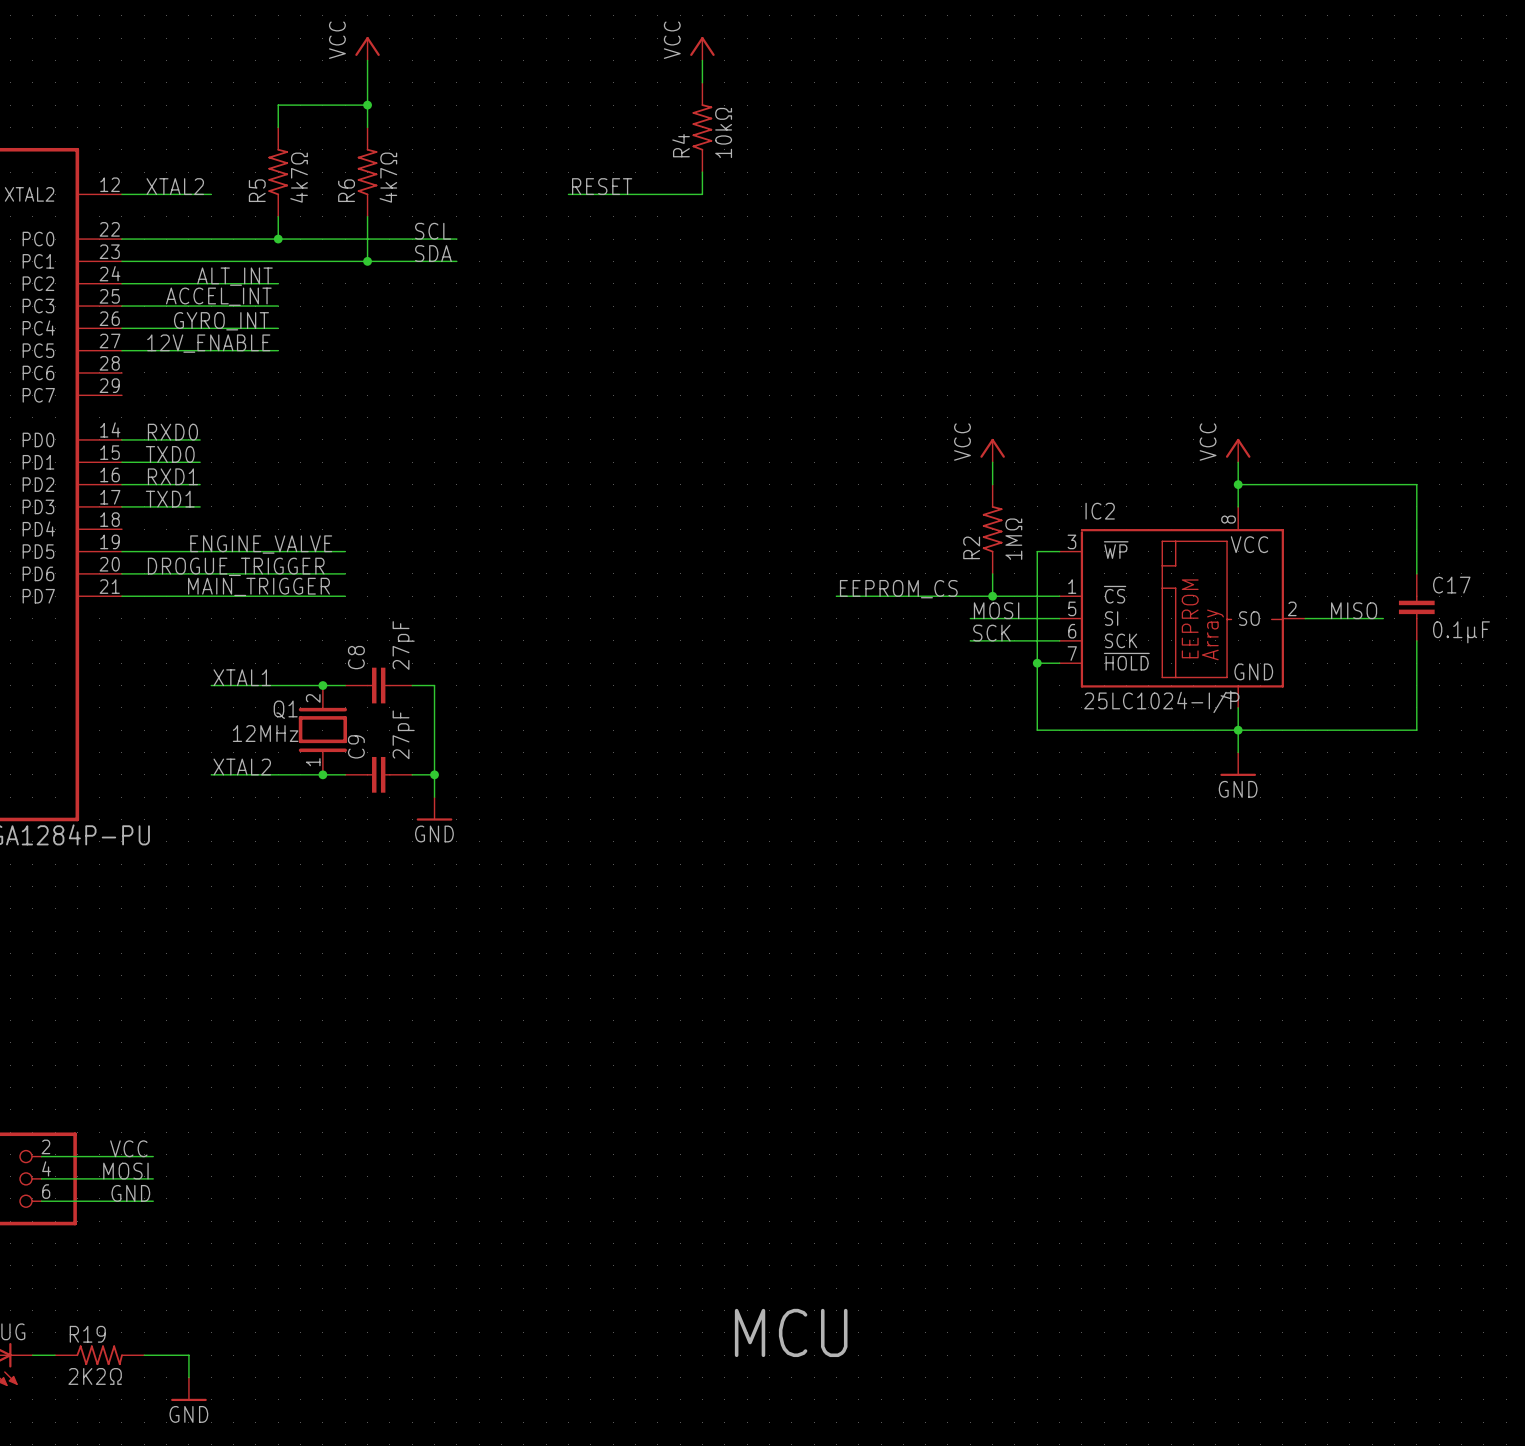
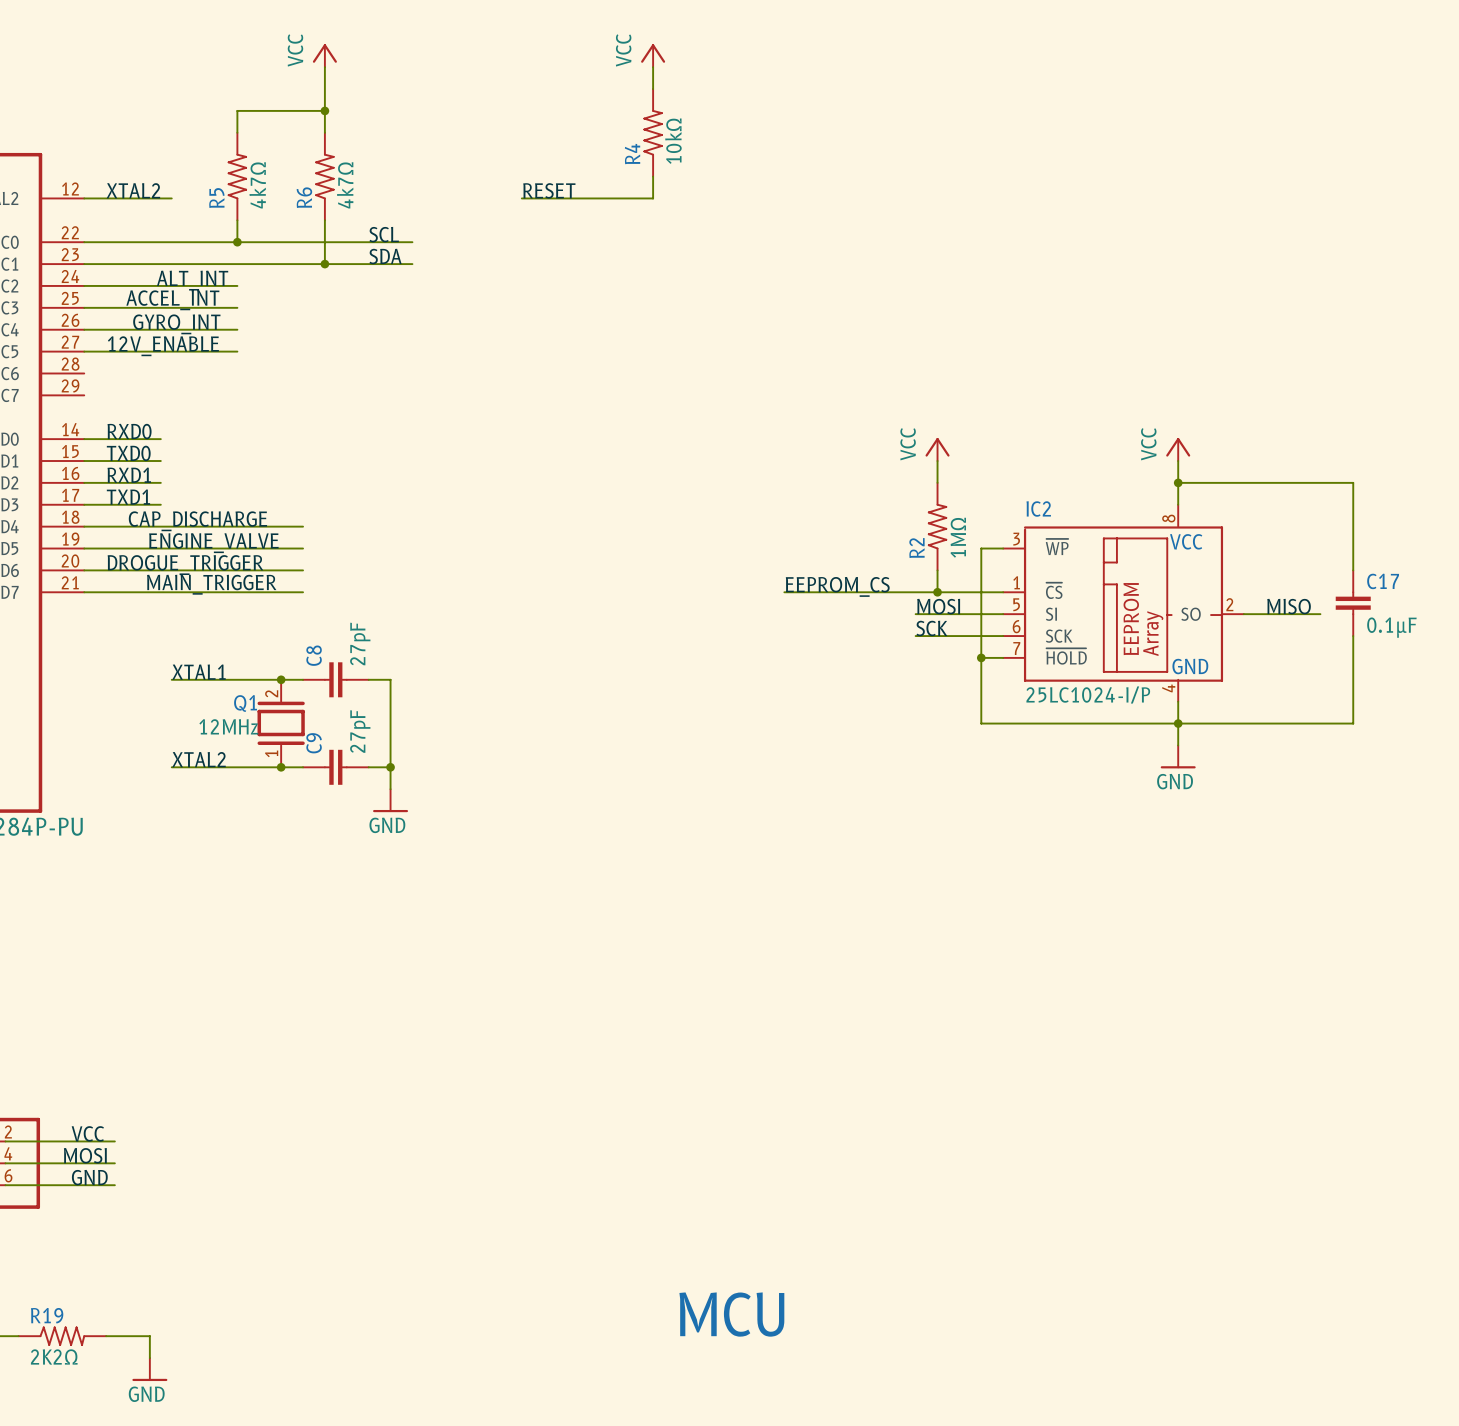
label: none -> CAP_DISCHARGE (197, 521)
wire: none -> (84, 526) (303, 526)

